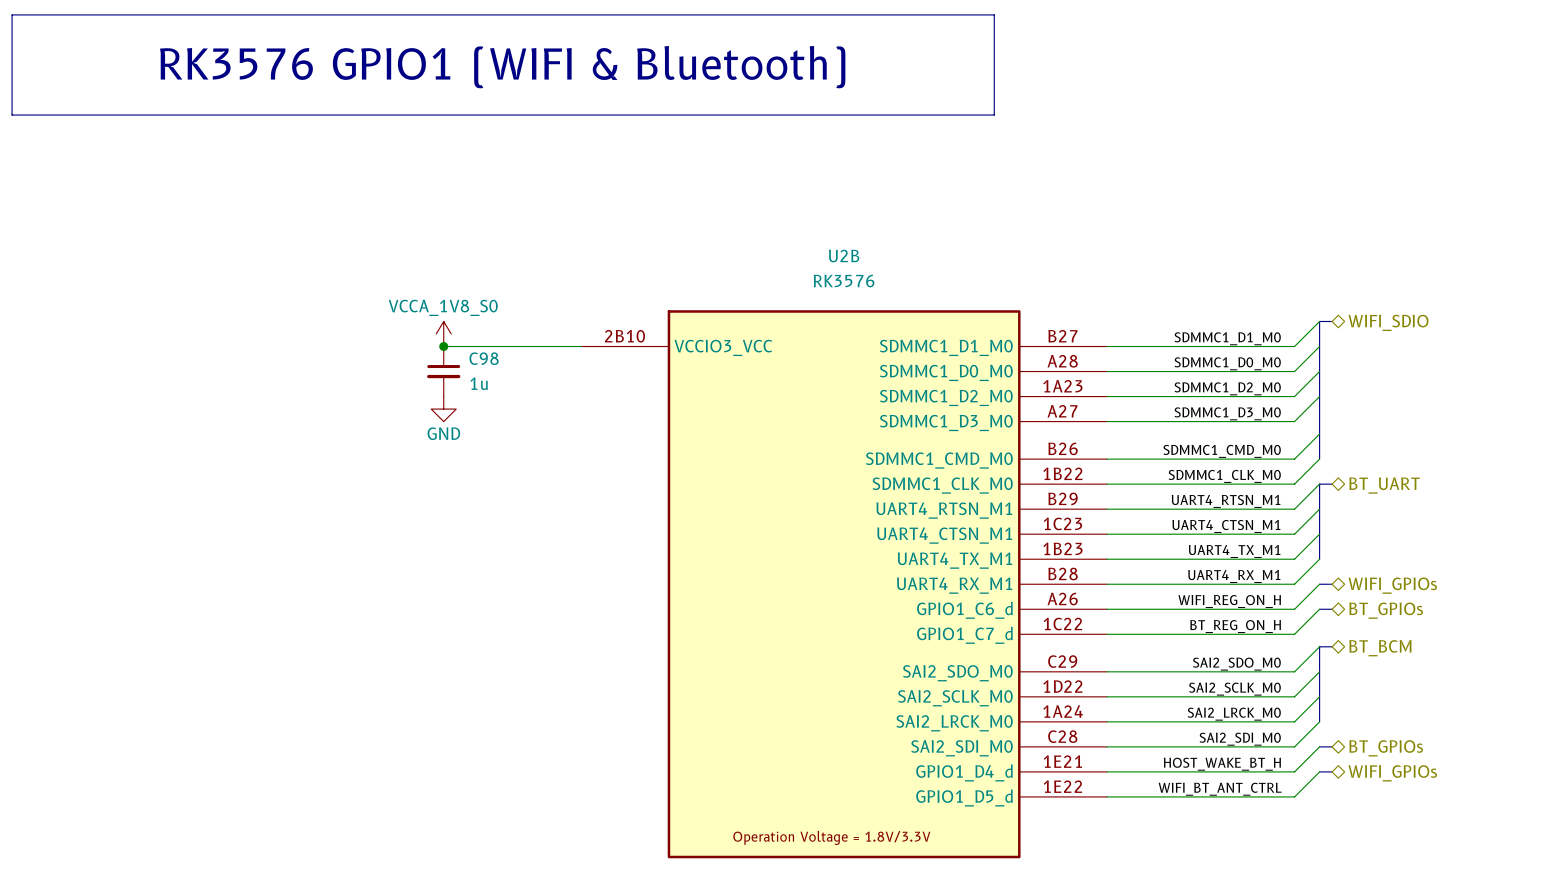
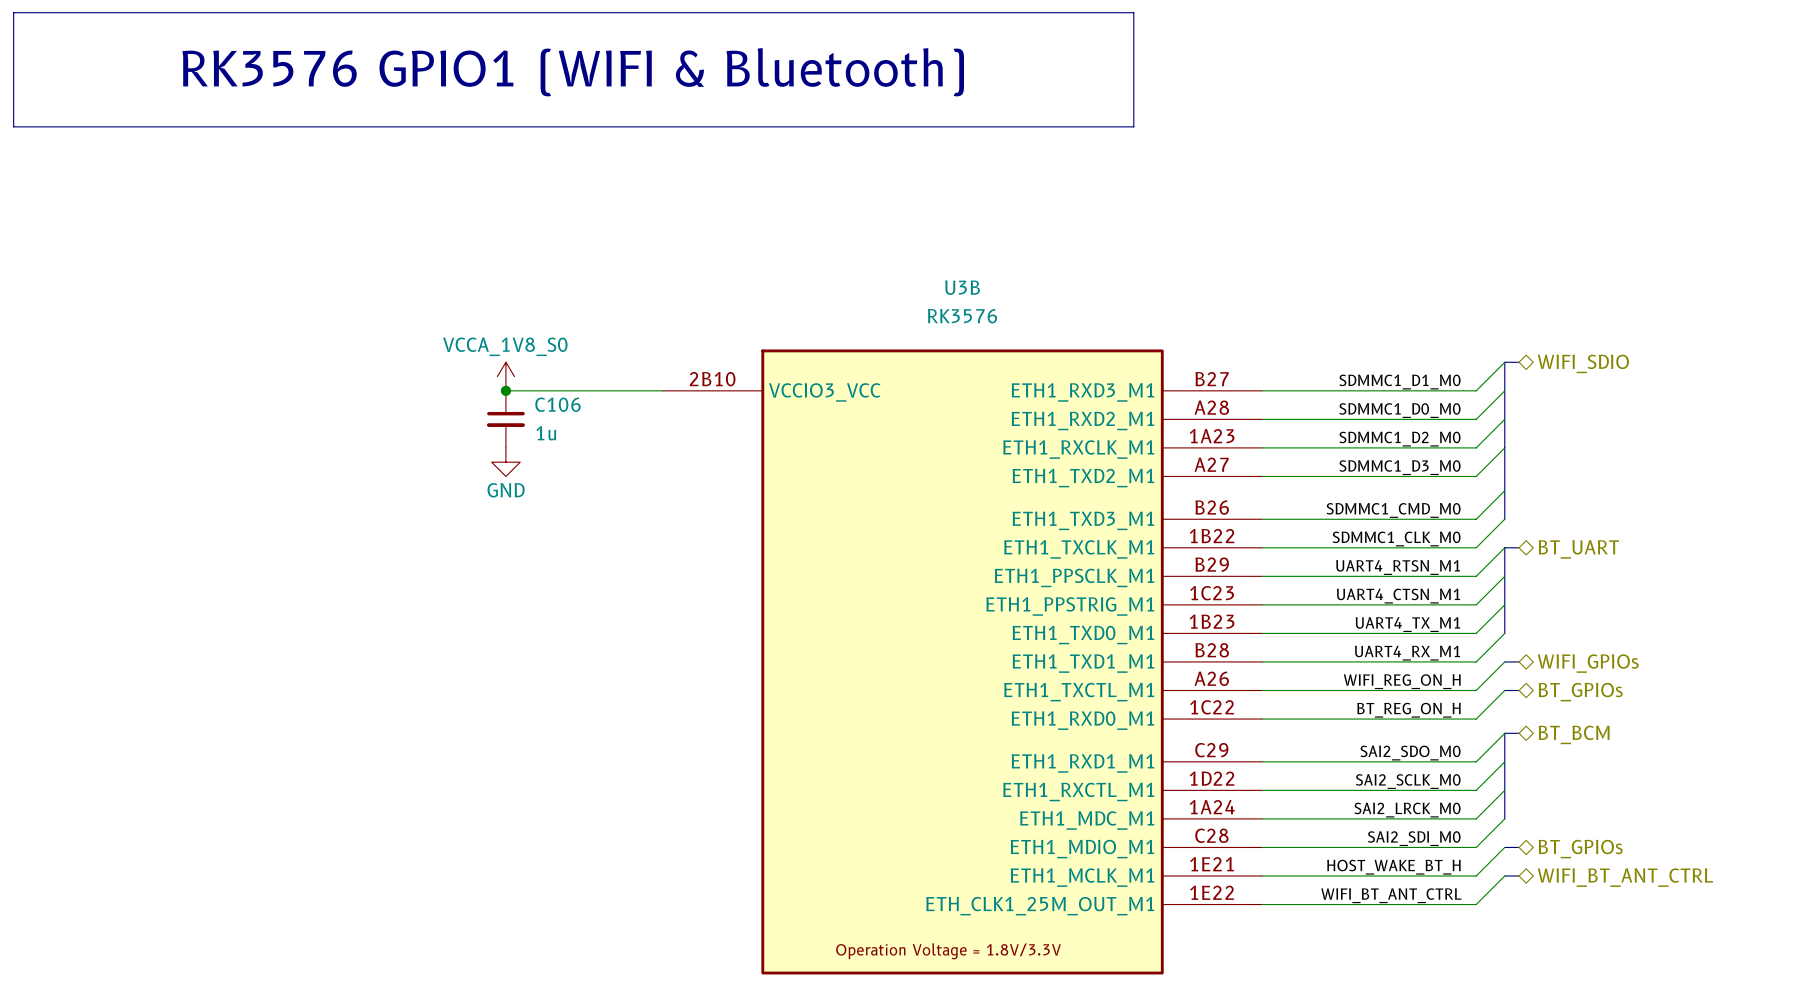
U2B name: U2B (844, 256) -> U3B (962, 287)
U2B symbol: [581, 310, 1107, 859] -> [662, 349, 1263, 975]
C98 name: C98 (484, 358) -> C106 (558, 404)
hierarchical label: WIFI_GPIOs (1392, 773) -> WIFI_BT_ANT_CTRL (1625, 877)

